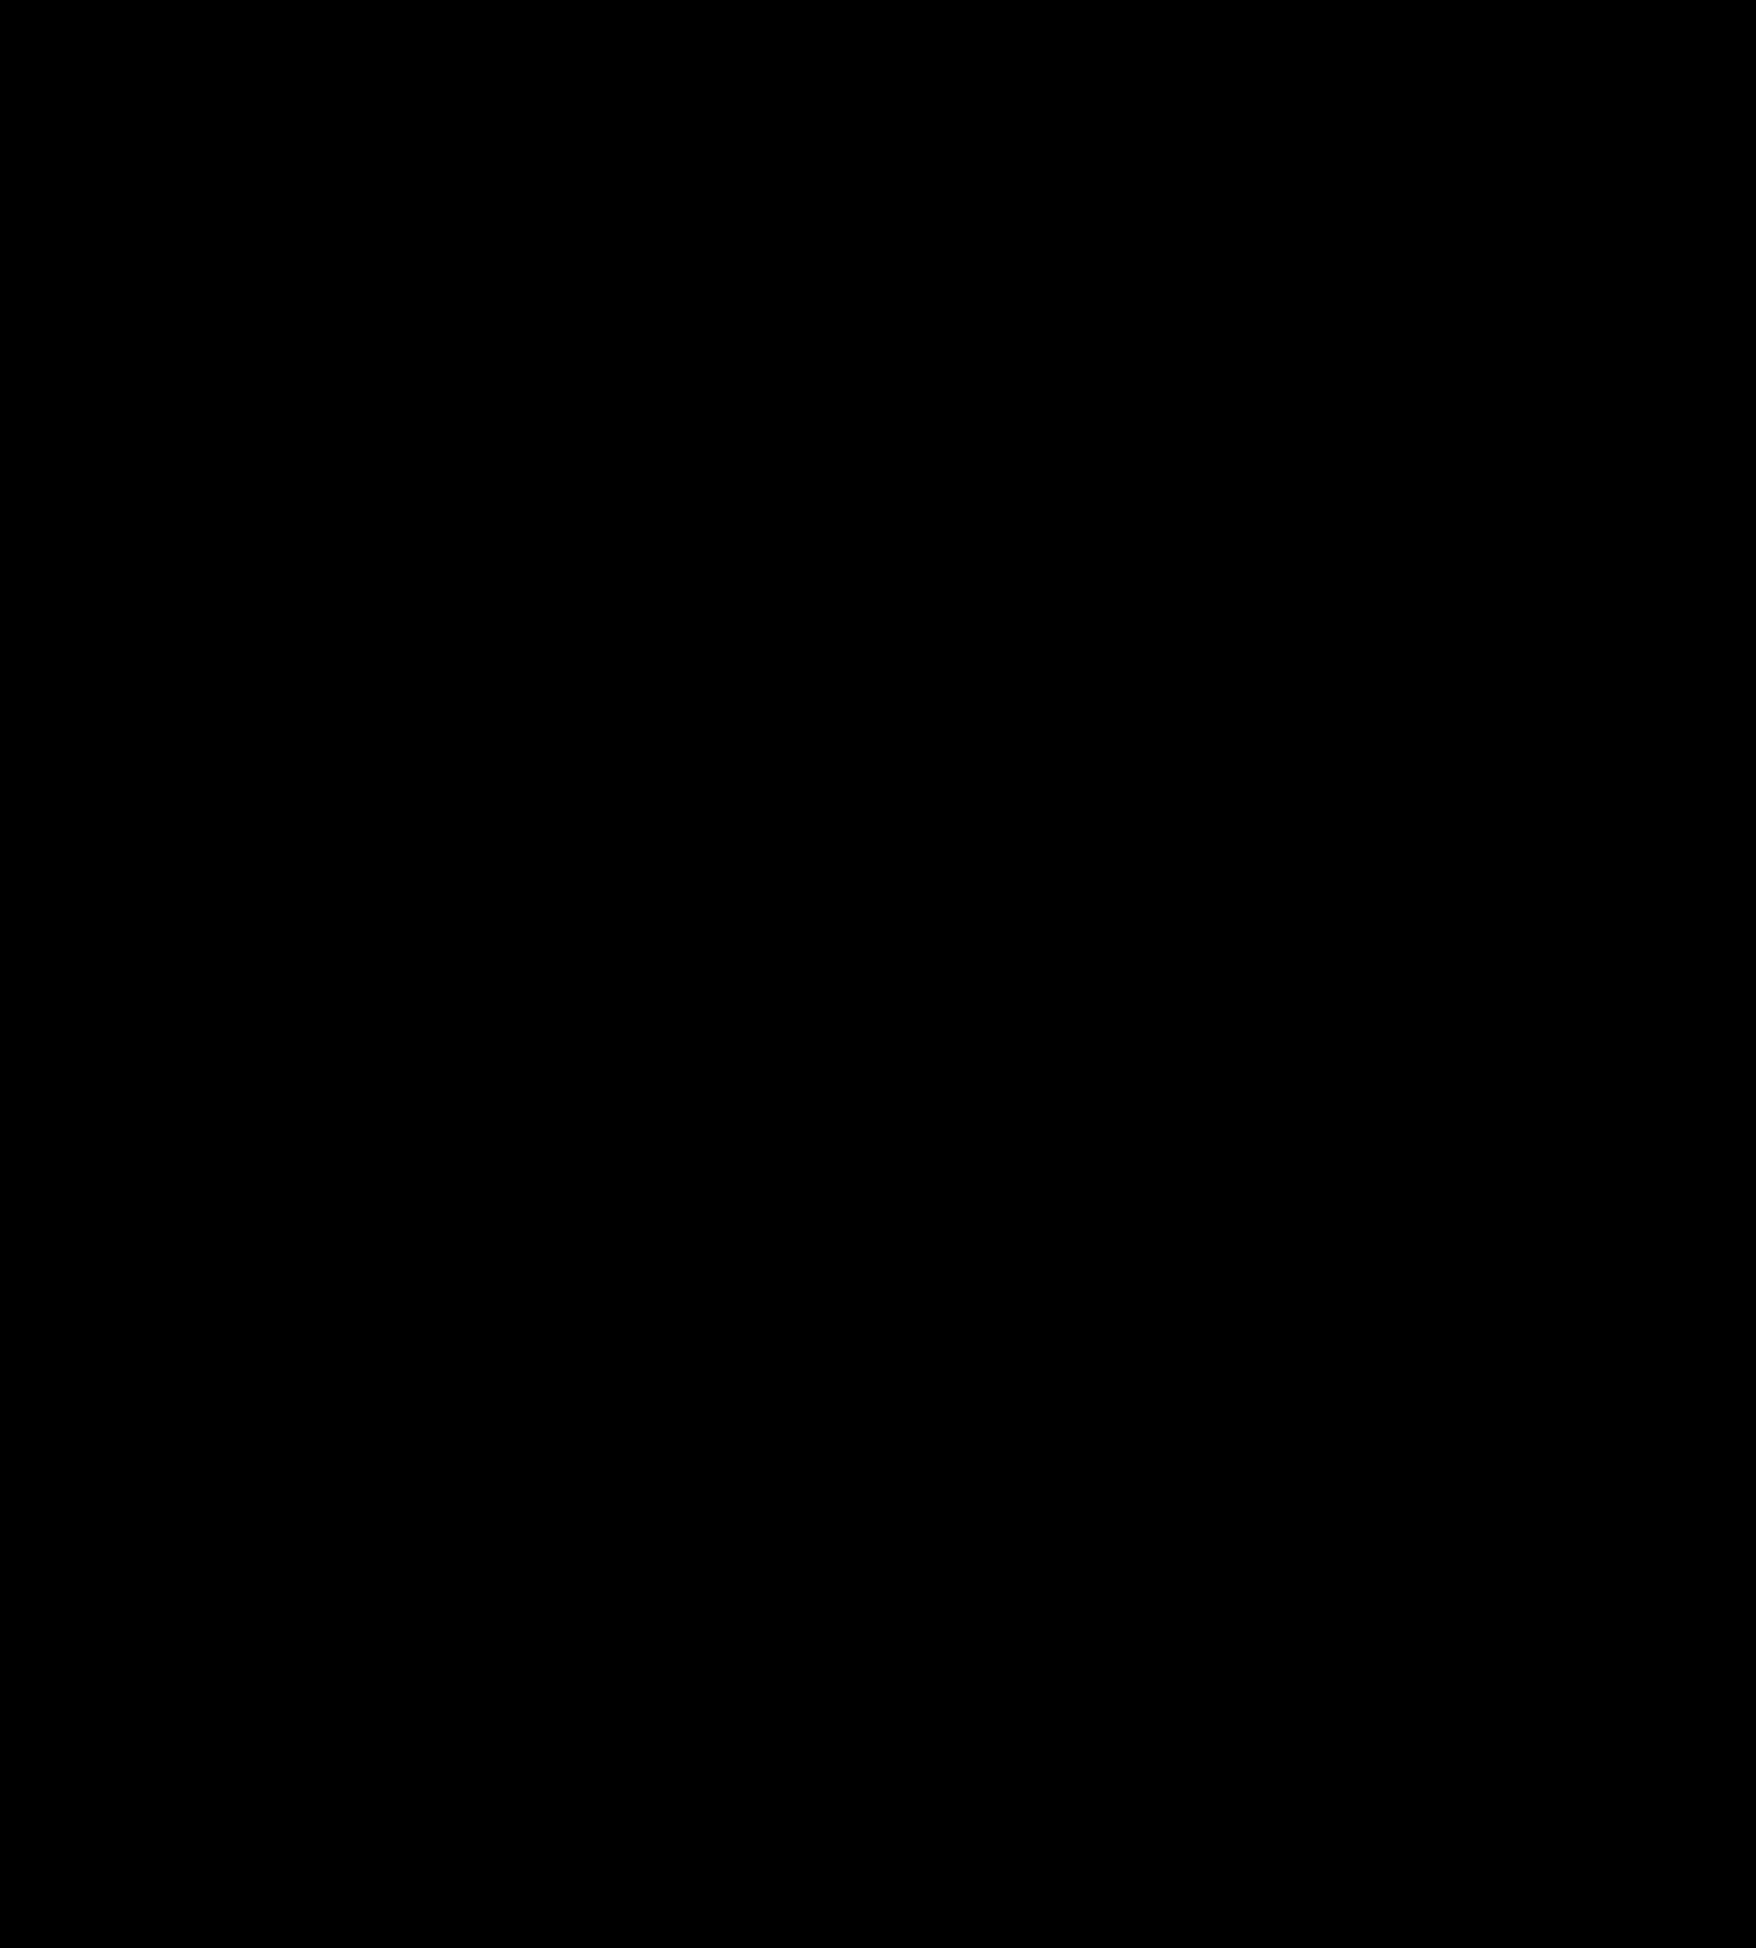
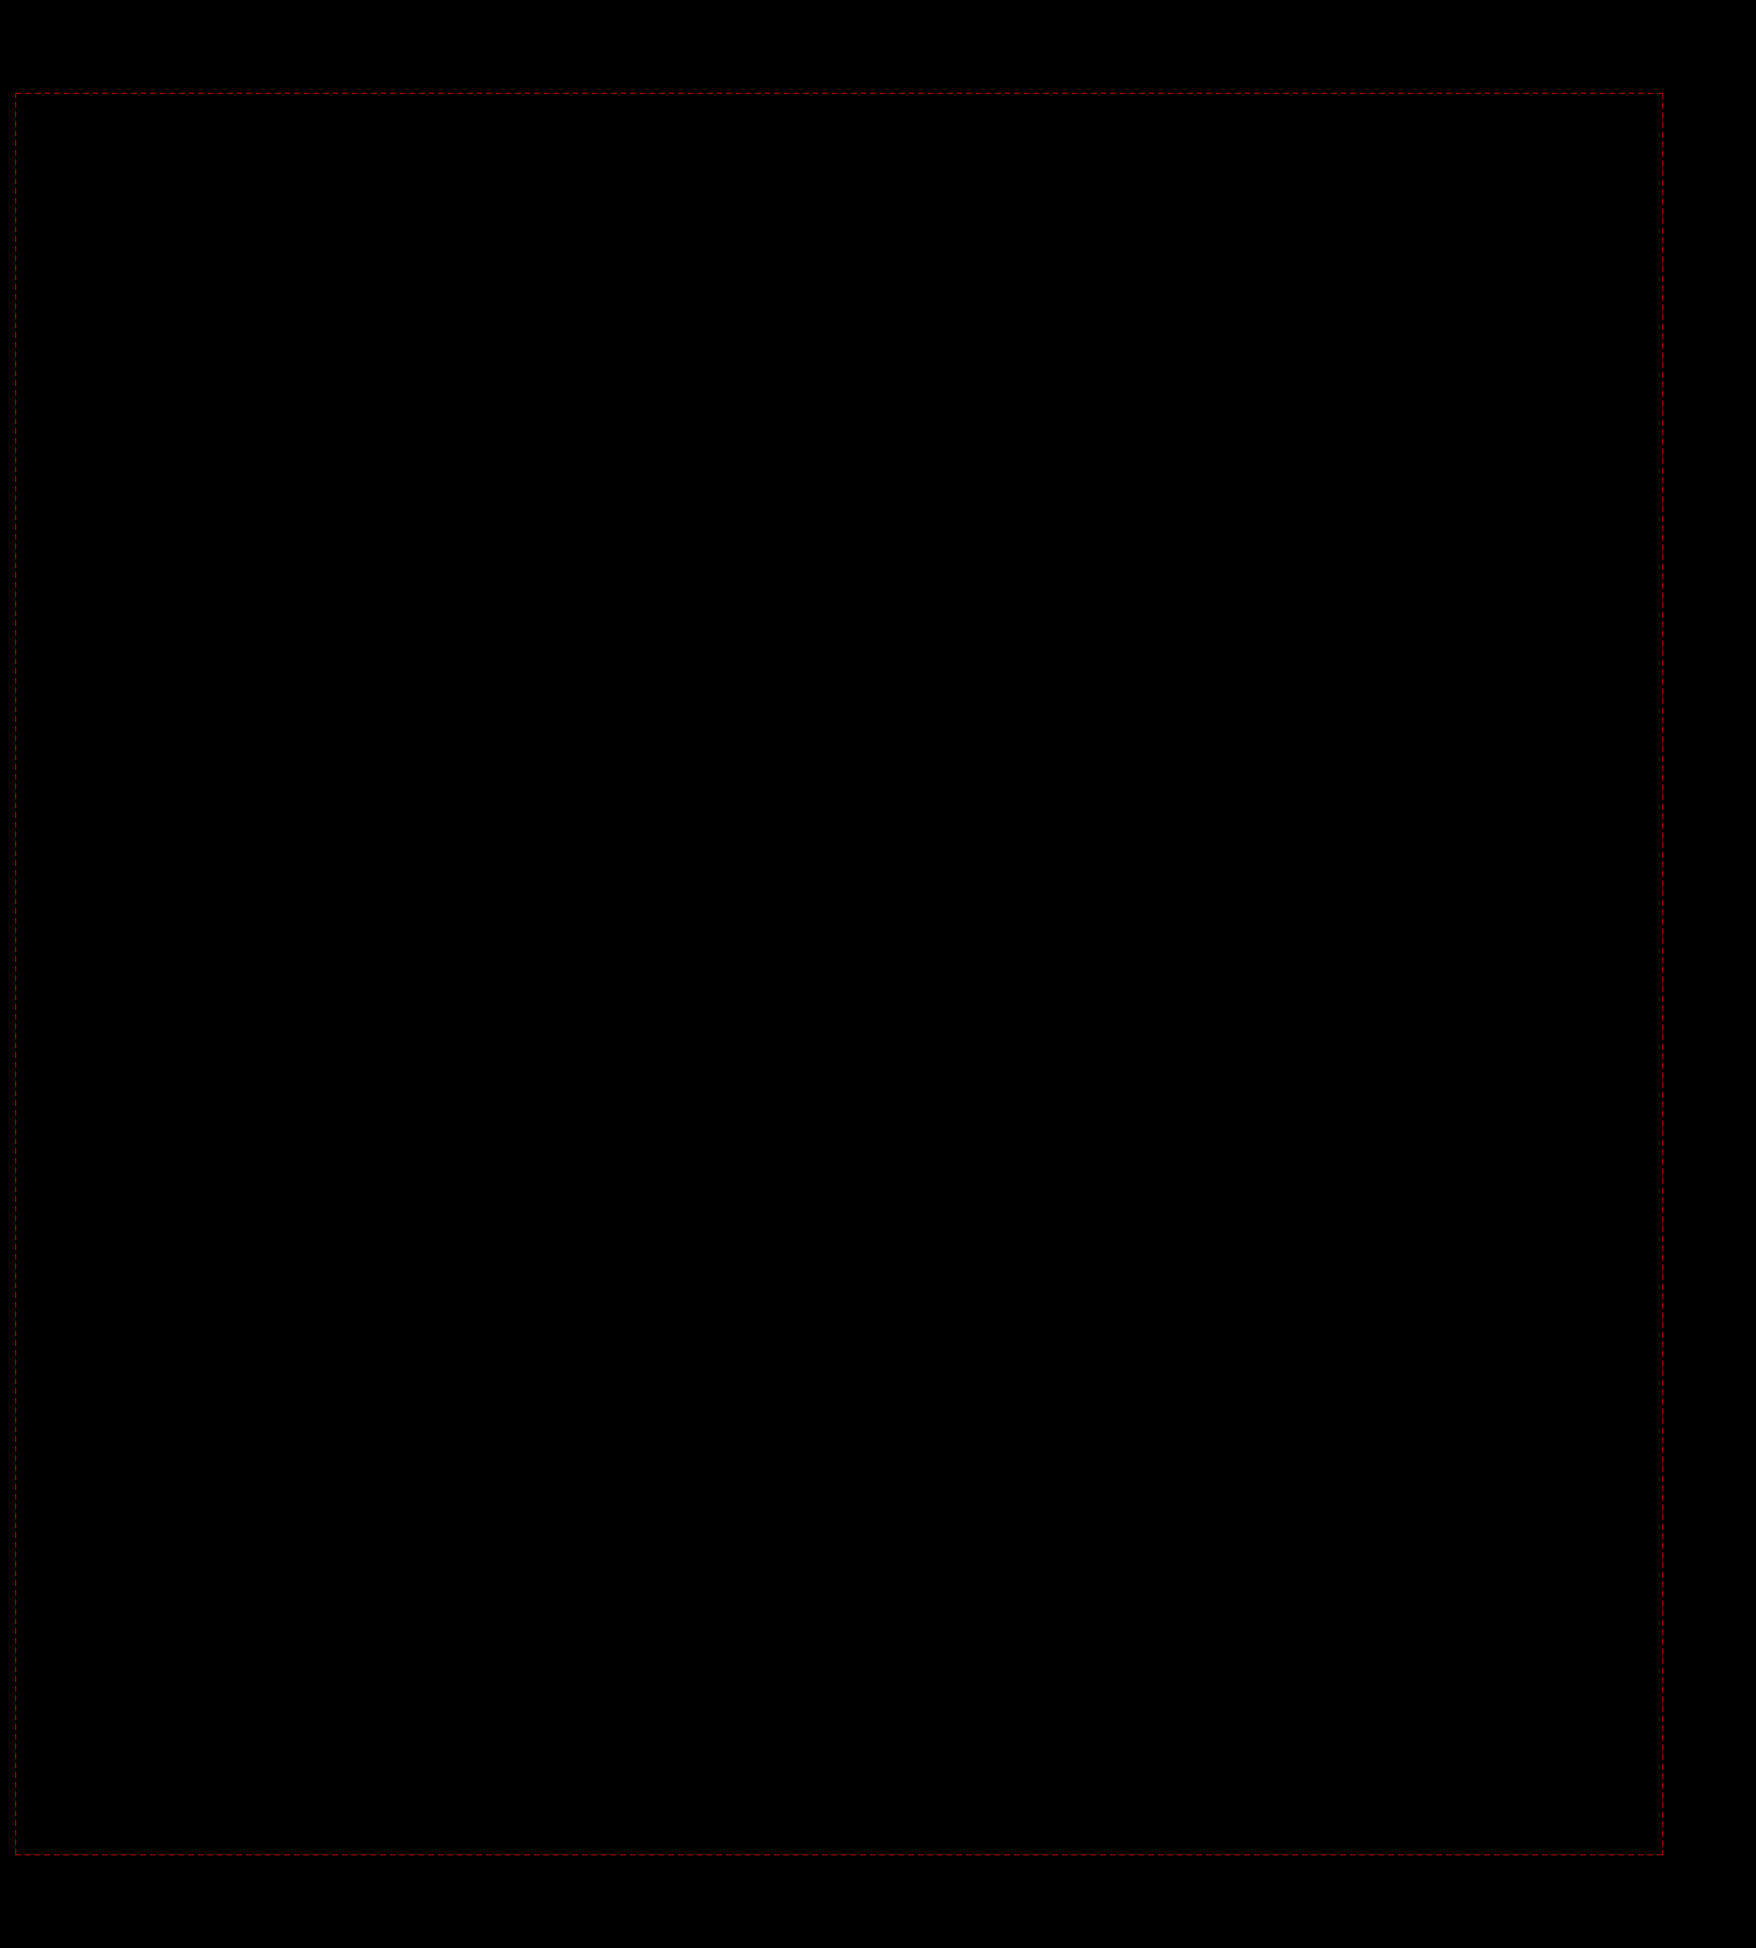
zone outline: none -> (15, 93) (1662, 93) (1662, 1854) (15, 1854) (15, 93)

